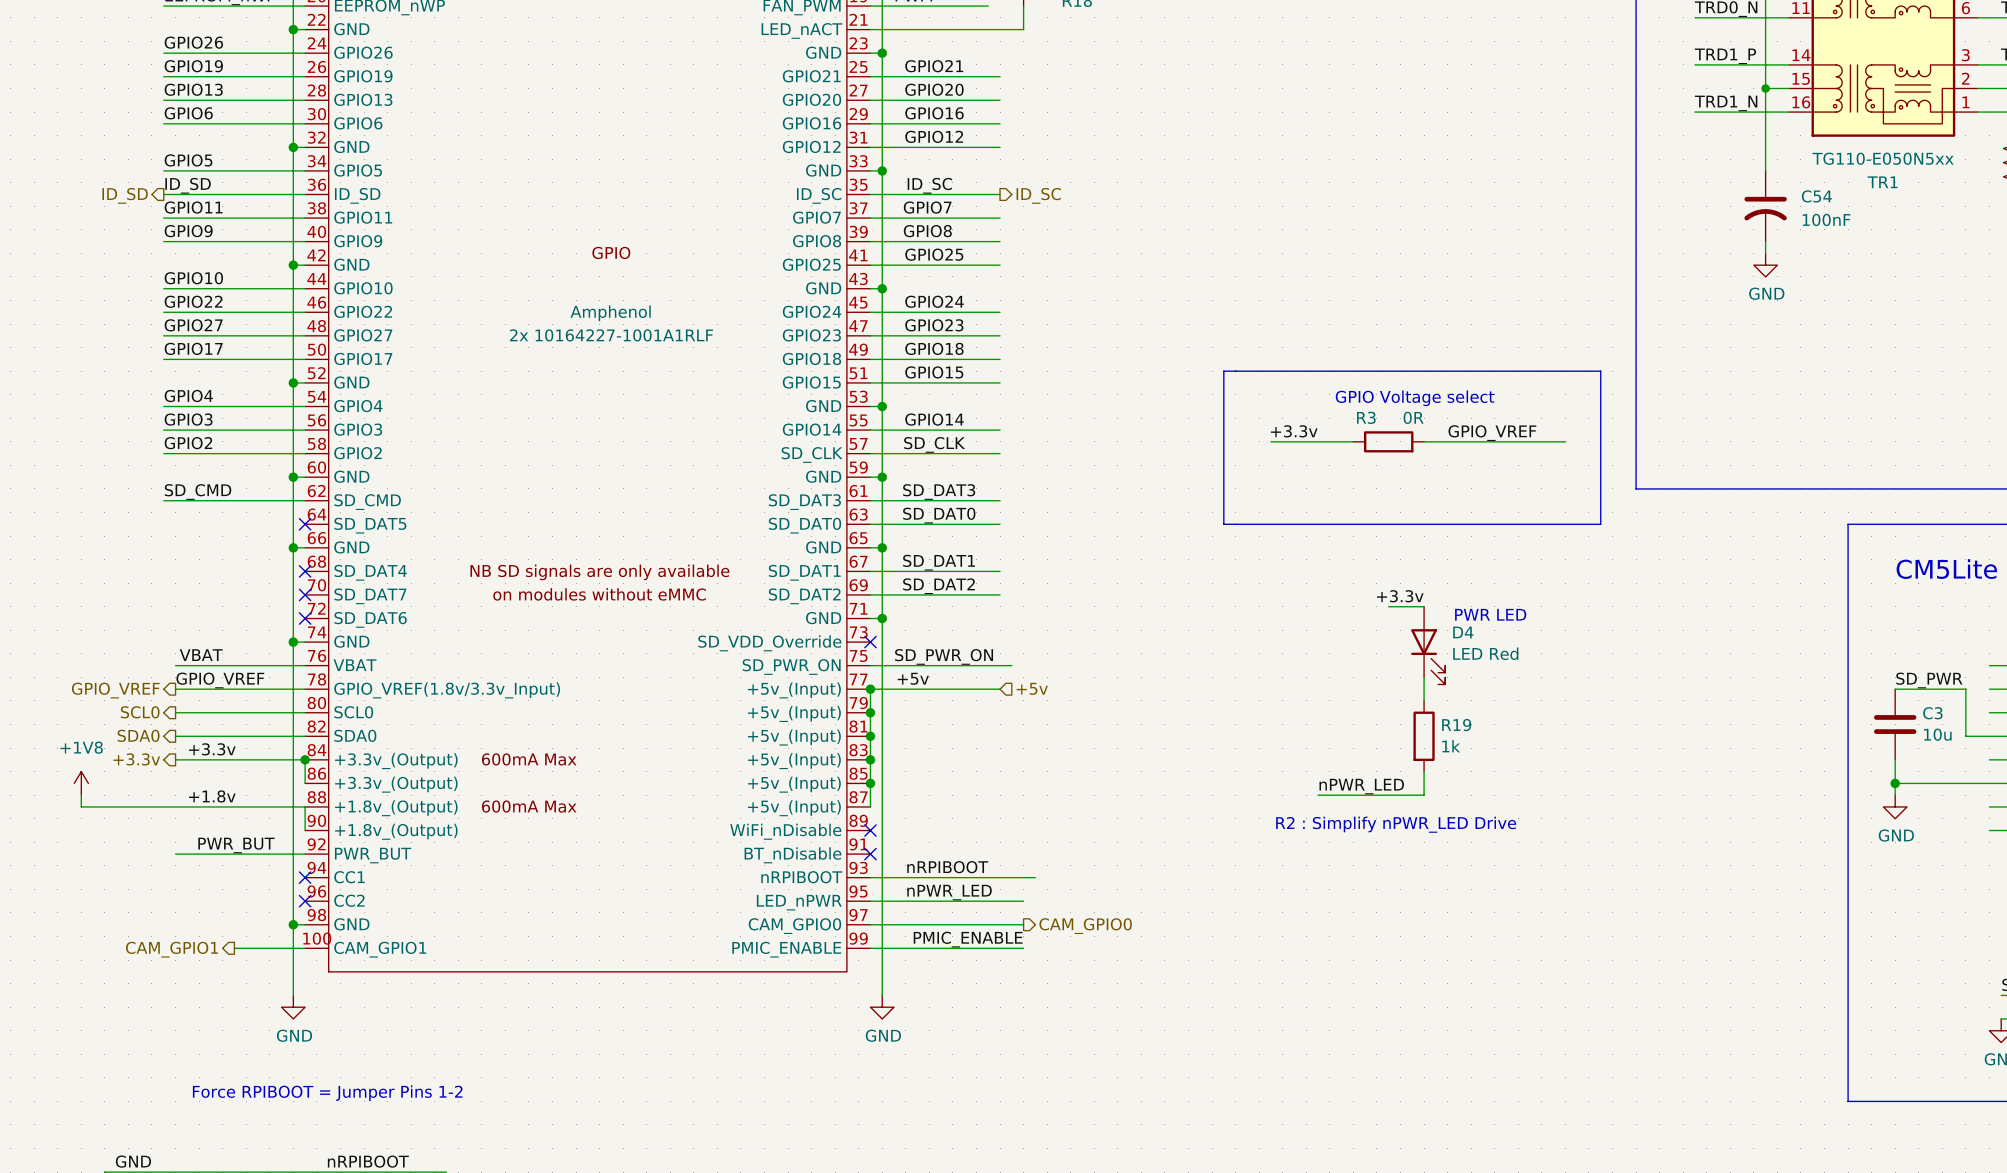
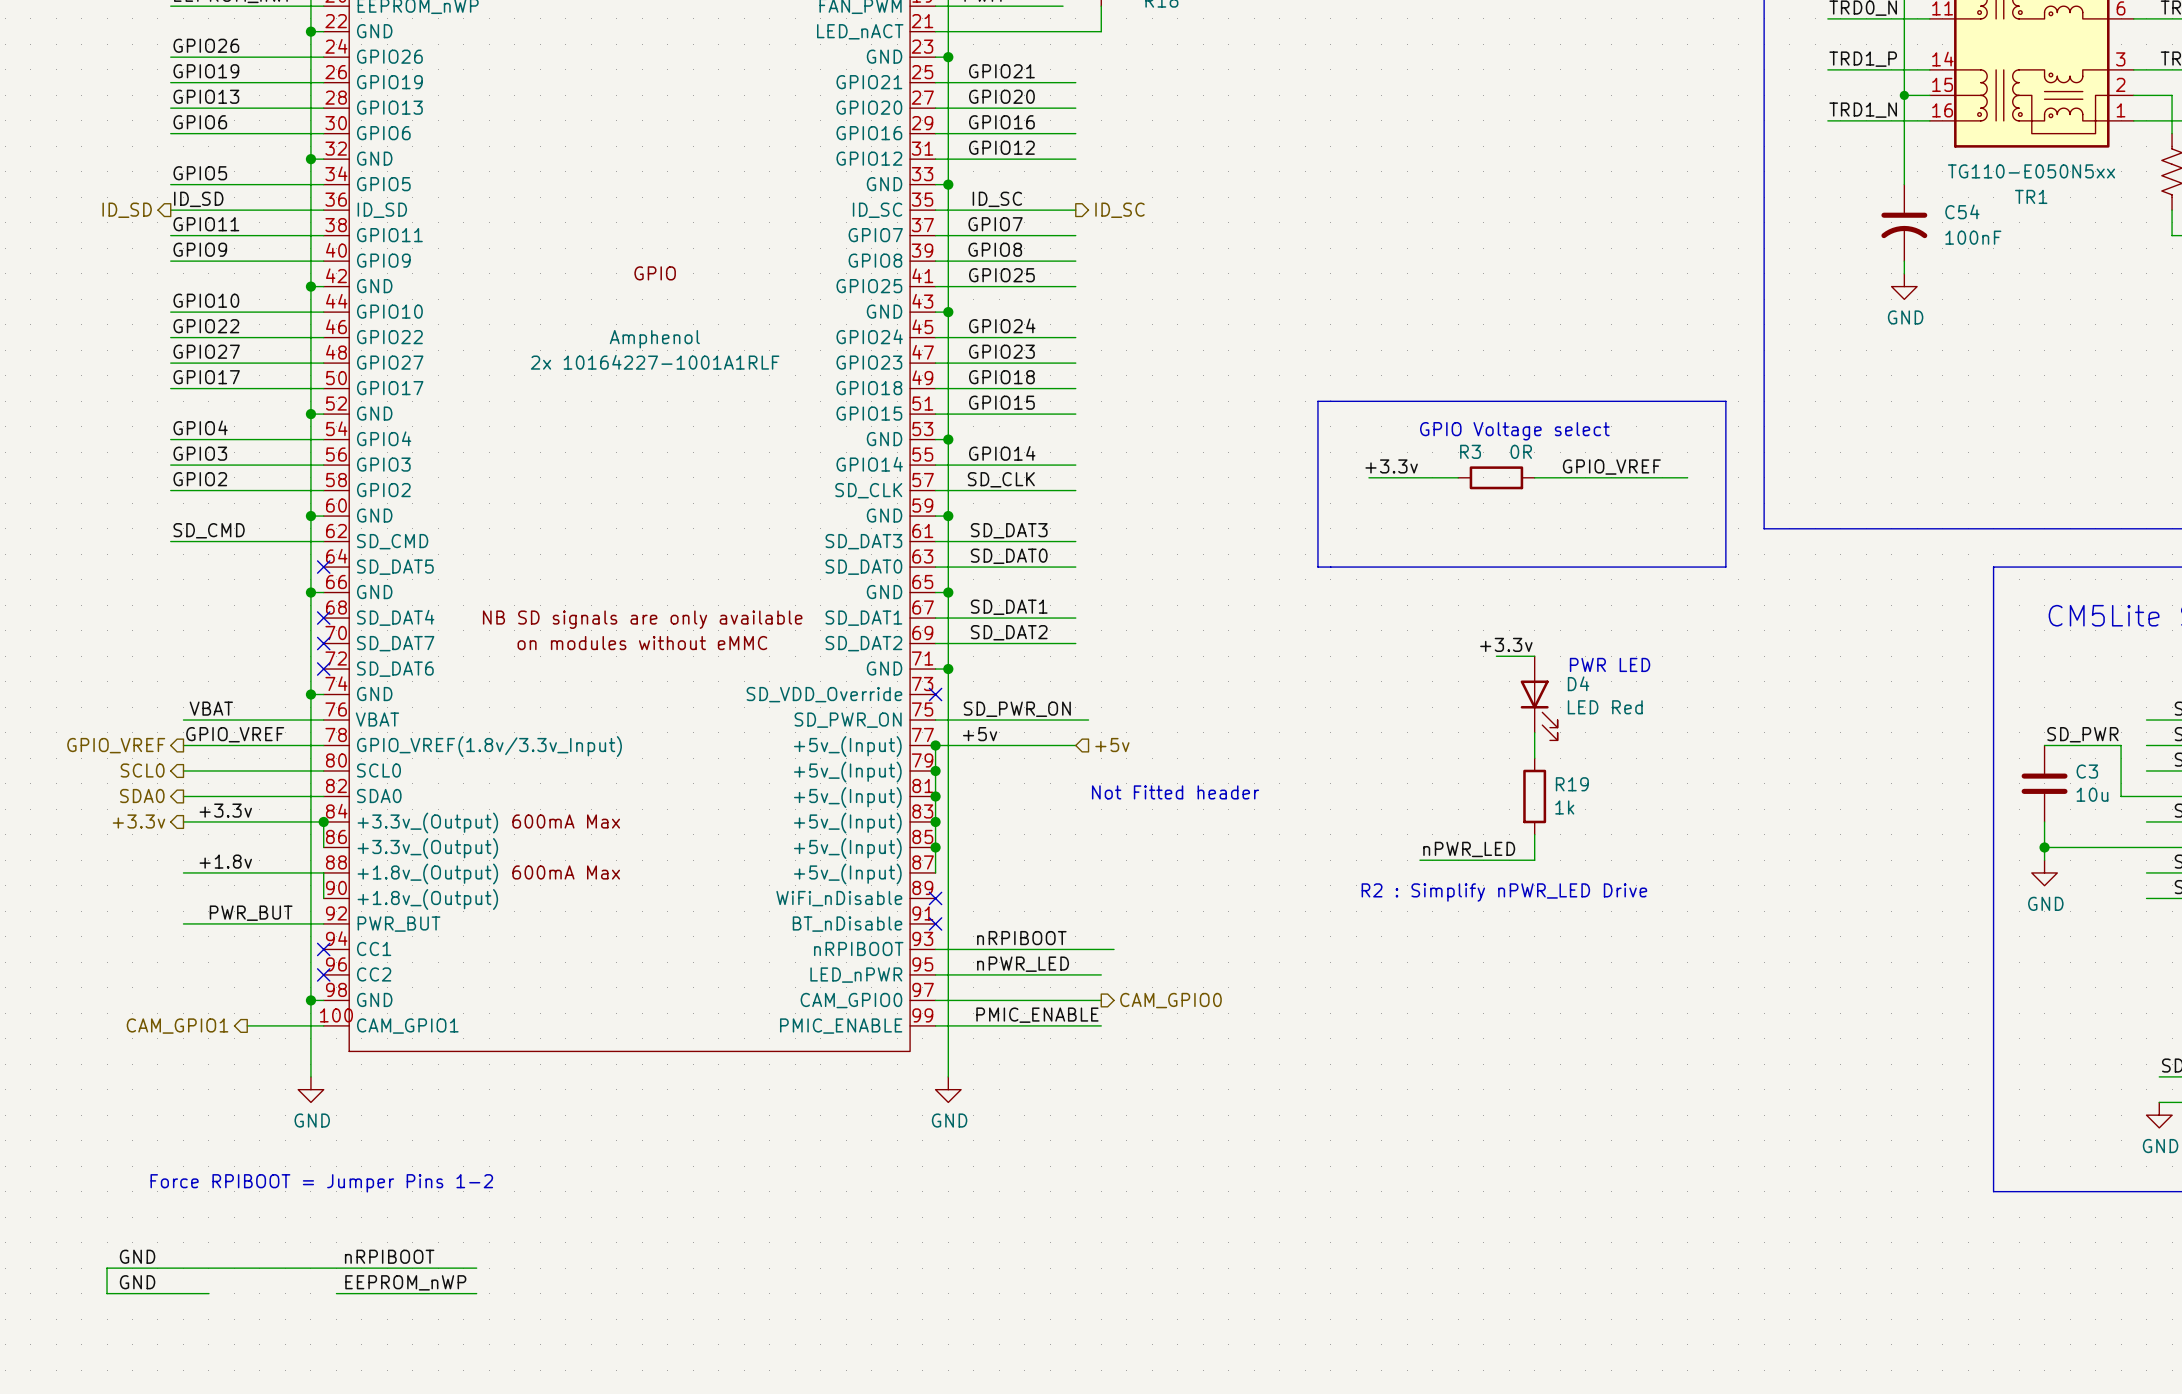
text: none -> Not Fitted header (1175, 792)
power symbol: +1V8 (81, 783) -> none
wire: (81, 795) (81, 806) (175, 806) -> none

